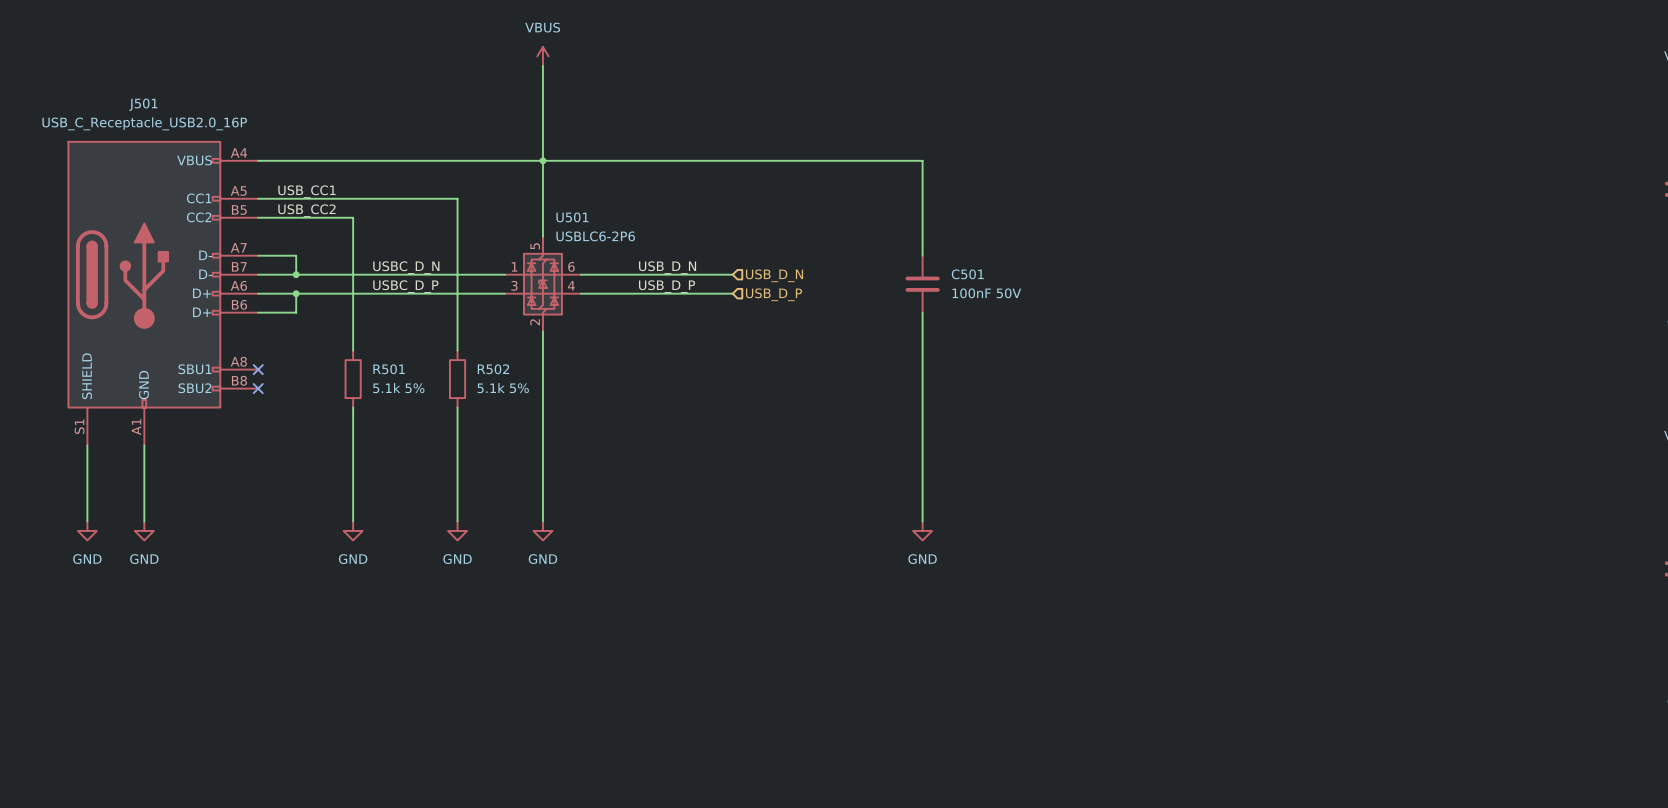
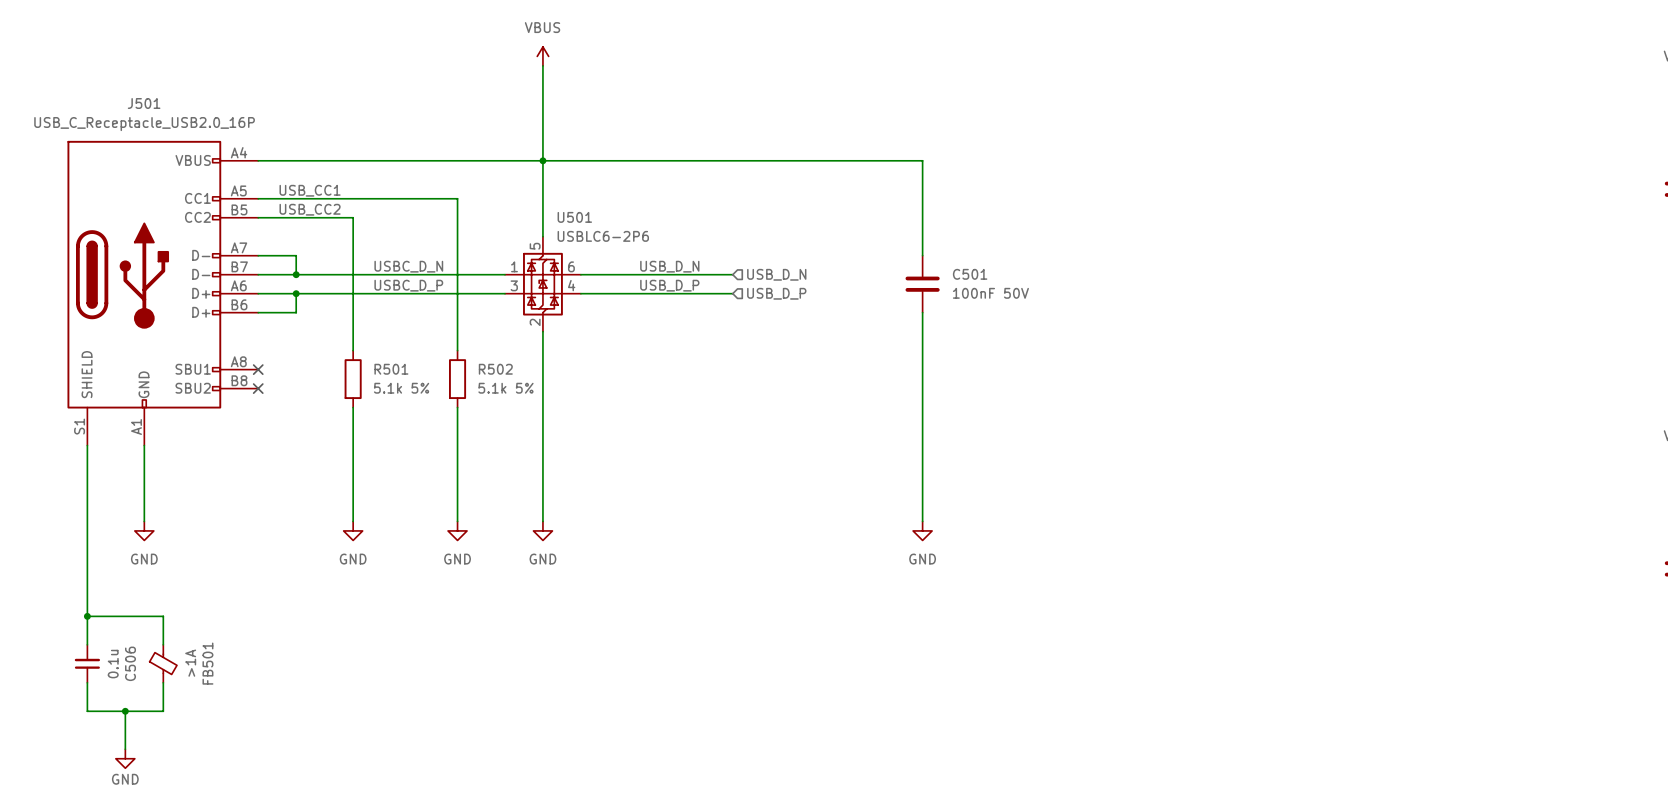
wire: none -> (87, 521) (87, 644)
power symbol: GND (87, 530) -> none
wire: none -> (87, 616) (163, 616) (163, 644)
junction: none -> (87, 616)
C506: none -> 0.1u (87, 663)
FB501: none -> >1A (163, 663)
wire: none -> (87, 682) (87, 711) (163, 711) (163, 682)
wire: none -> (125, 711) (125, 749)
junction: none -> (125, 711)
power symbol: none -> GND (125, 758)

